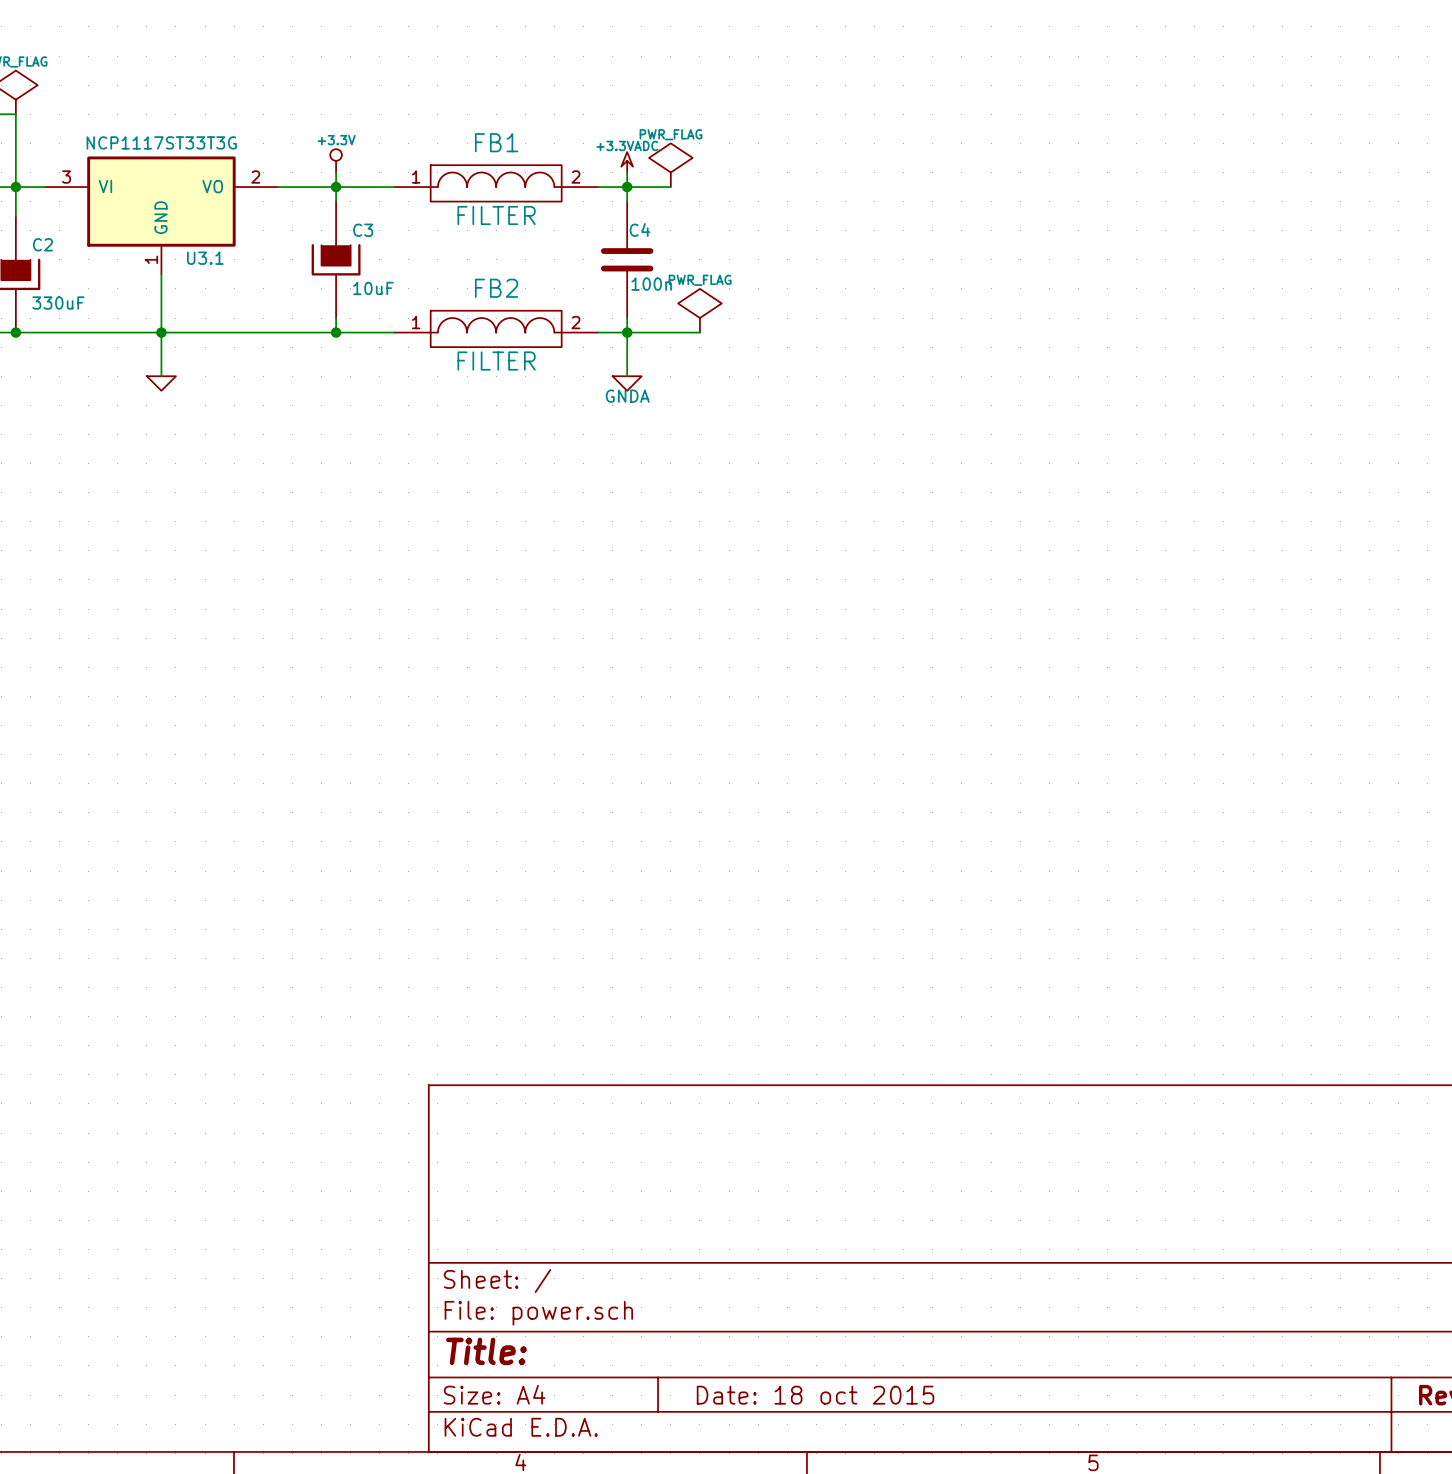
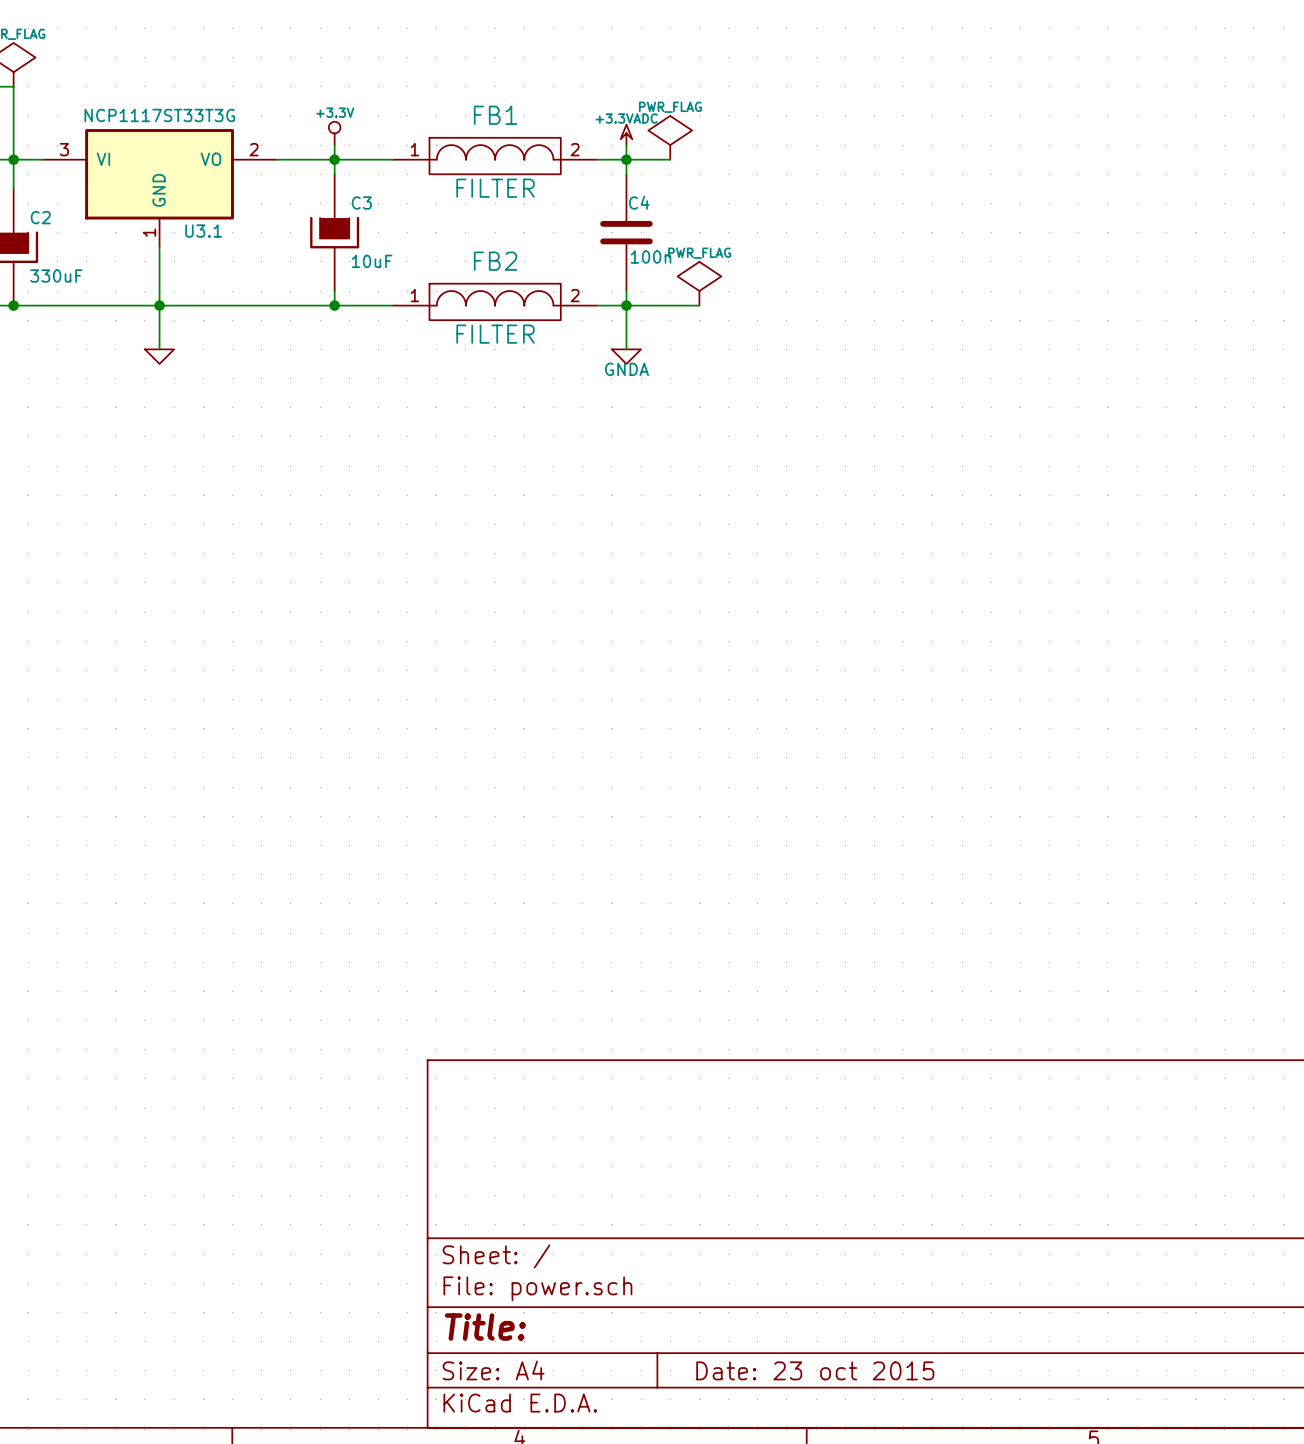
title block: Date: 18 oct 2015 (815, 1395) -> Date: 23 oct 2015 (815, 1370)

